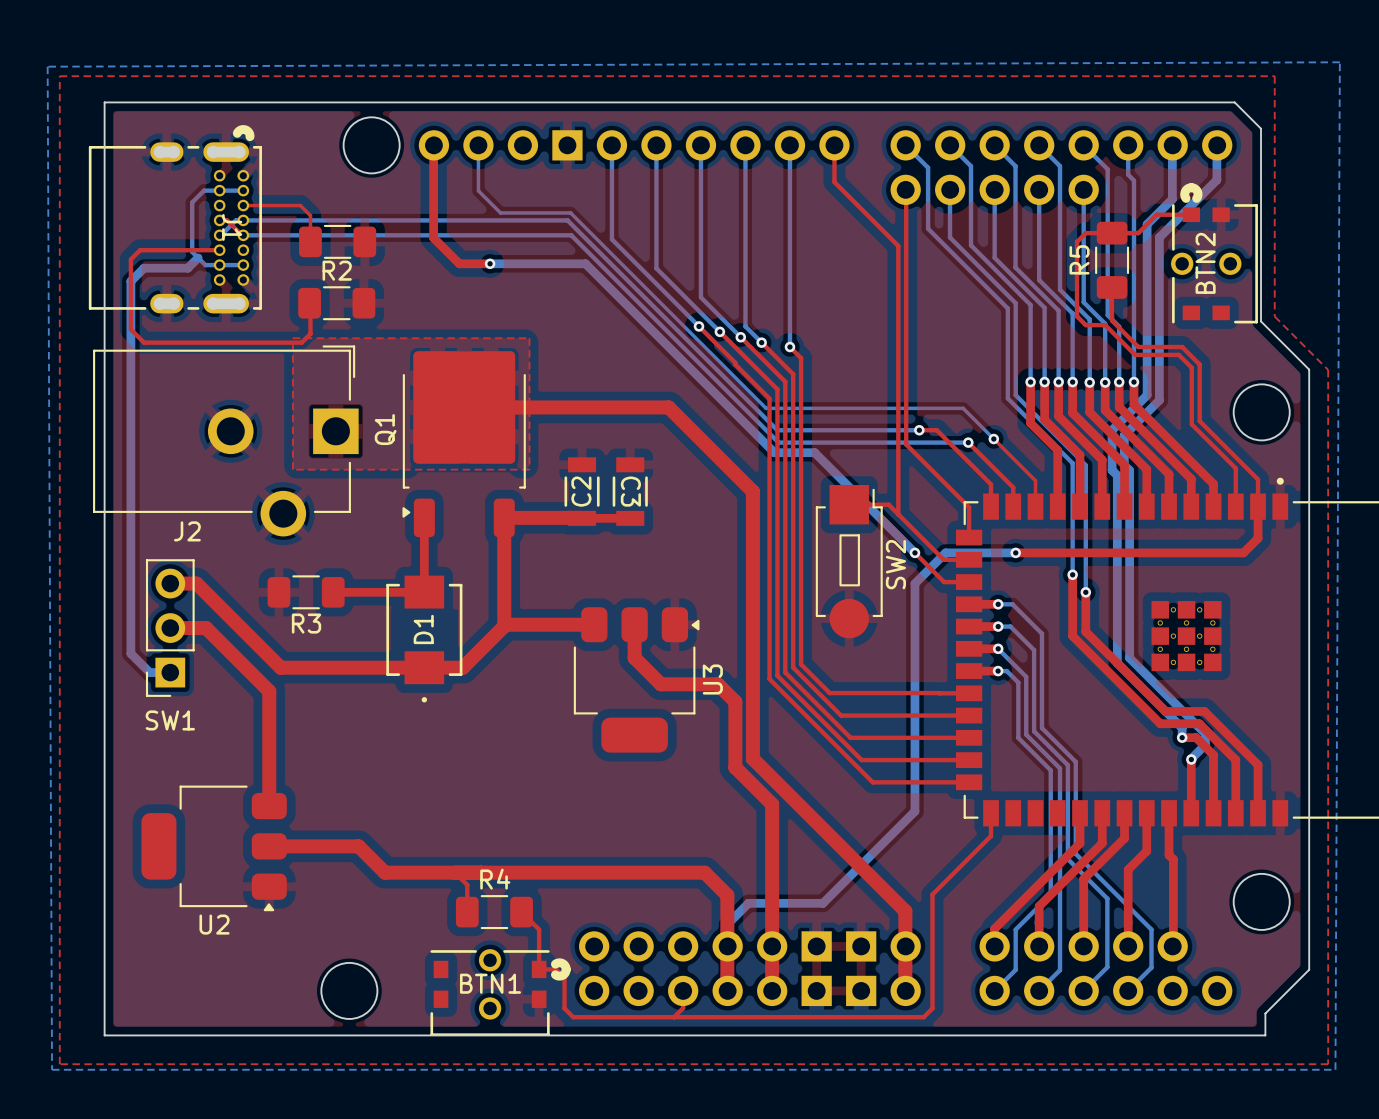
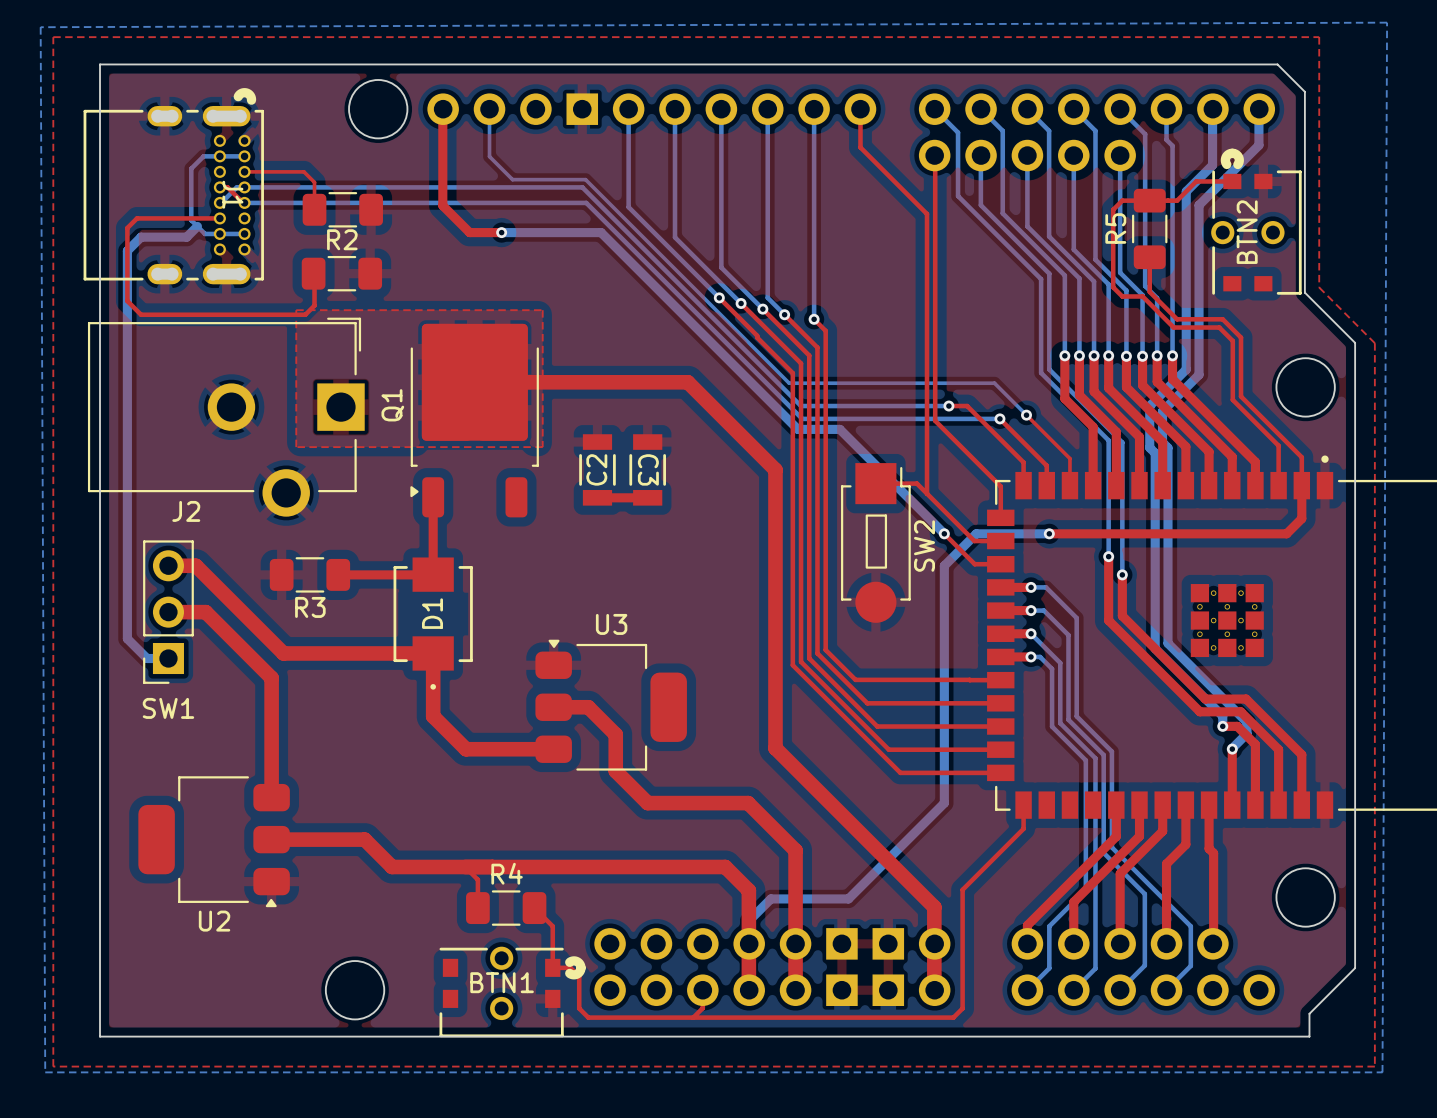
top track: (582, 518) (504, 517) (504, 626) -> none
top track: (594, 624) (505, 624) (462, 667) (424, 667) -> (553, 749) (466, 749) (433, 716) (433, 653)
top track: (634, 624) (634, 658) (660, 684) (717, 684) (735, 701) (735, 767) (772, 804) (772, 856) -> (553, 707) (588, 707) (615, 734) (615, 771) (647, 803) (748, 803) (795, 850)
U3 rotation: 0° (636, 679) -> 90° counterclockwise (611, 705)

